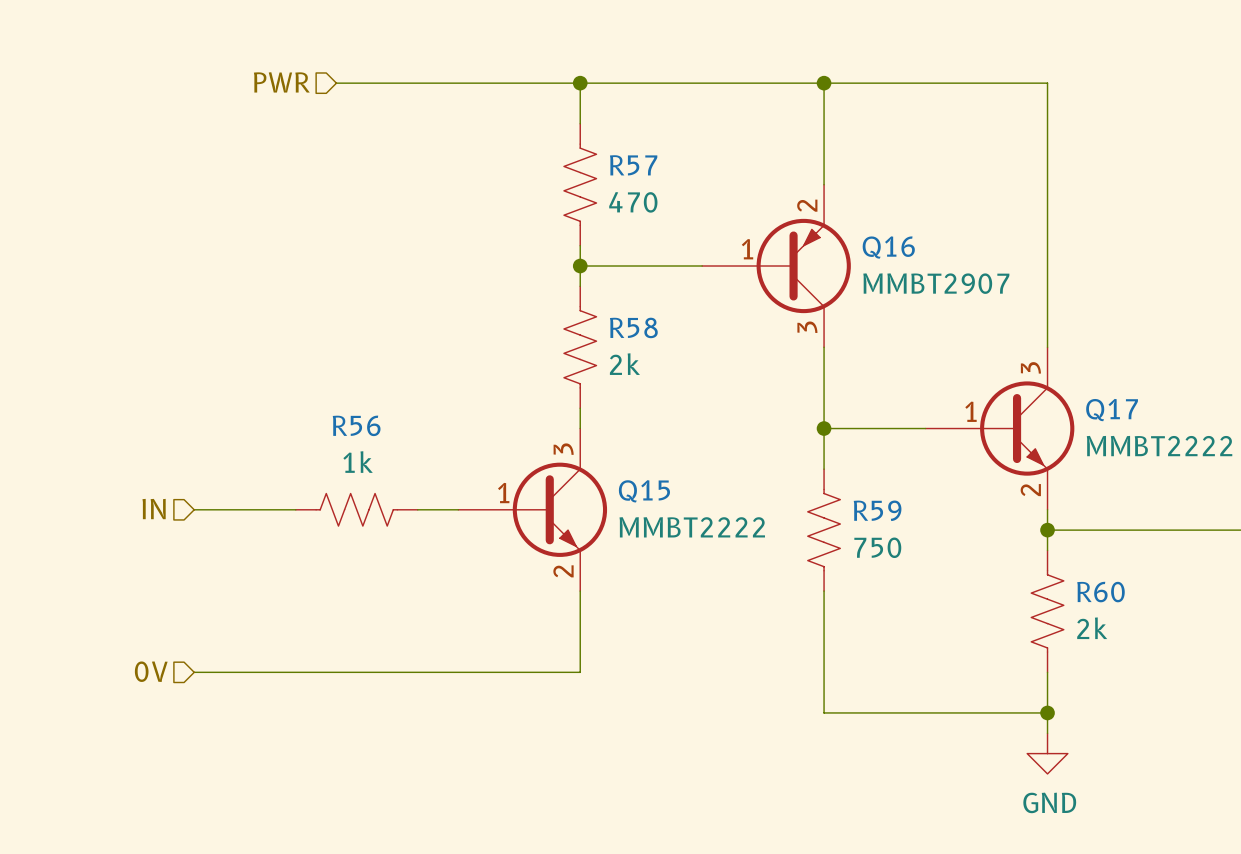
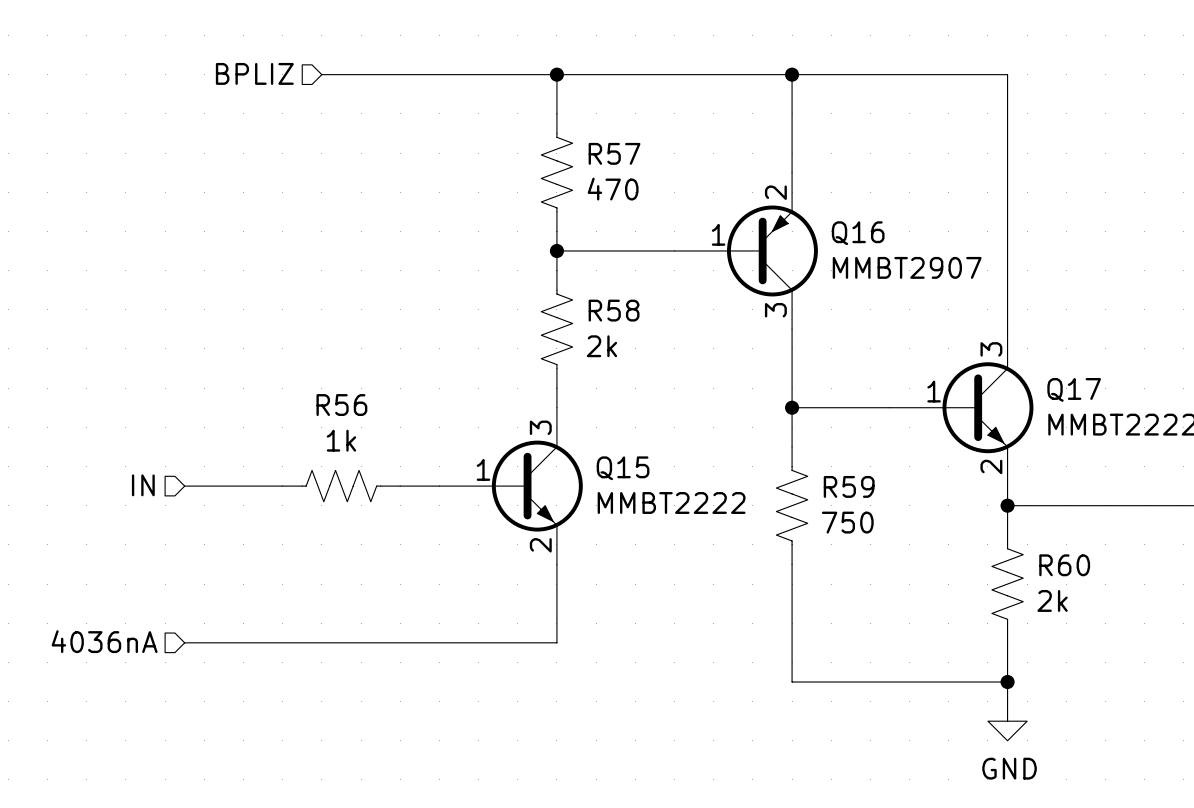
hierarchical label: PWR (281, 82) -> BPLIZ (254, 73)
hierarchical label: 0V (151, 671) -> 4036nA (104, 641)

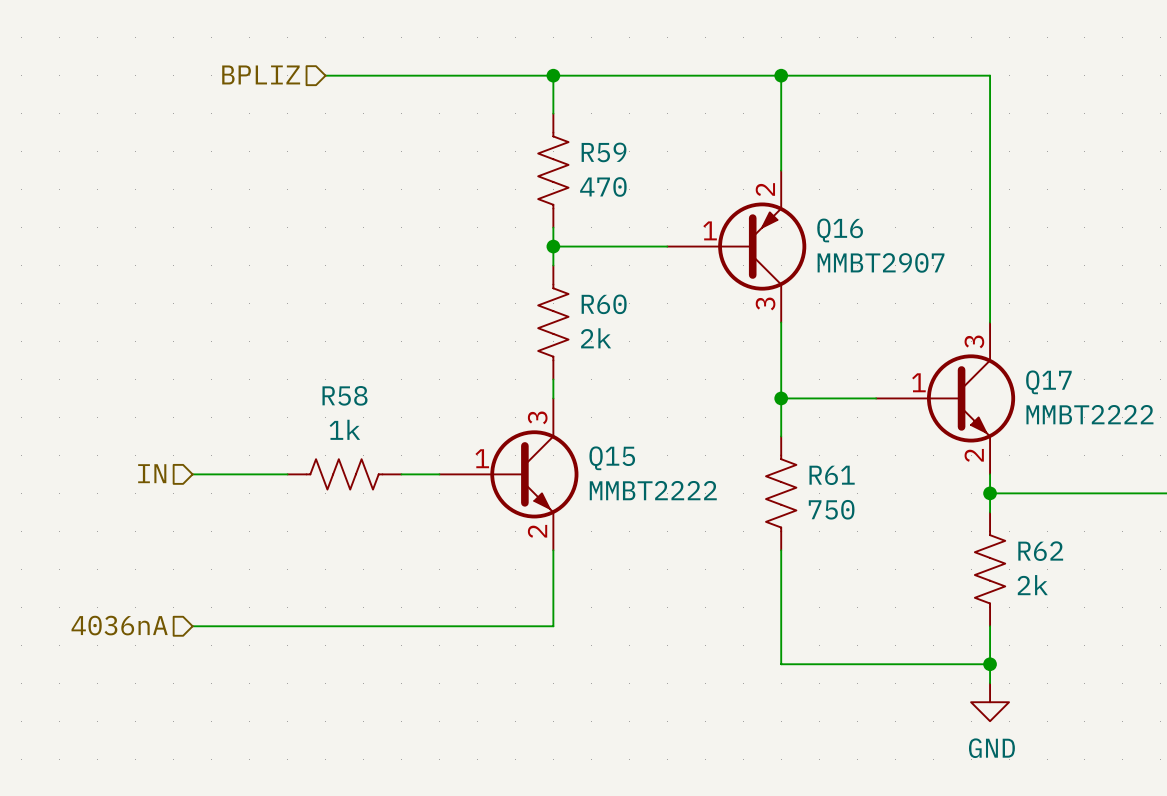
R57 name: R57 (614, 153) -> R59 (604, 152)
R58 name: R58 (614, 310) -> R60 (604, 304)
R56 name: R56 (341, 405) -> R58 (344, 395)
R59 name: R59 (849, 486) -> R61 (832, 475)
R60 name: R60 (1064, 565) -> R62 (1040, 551)

